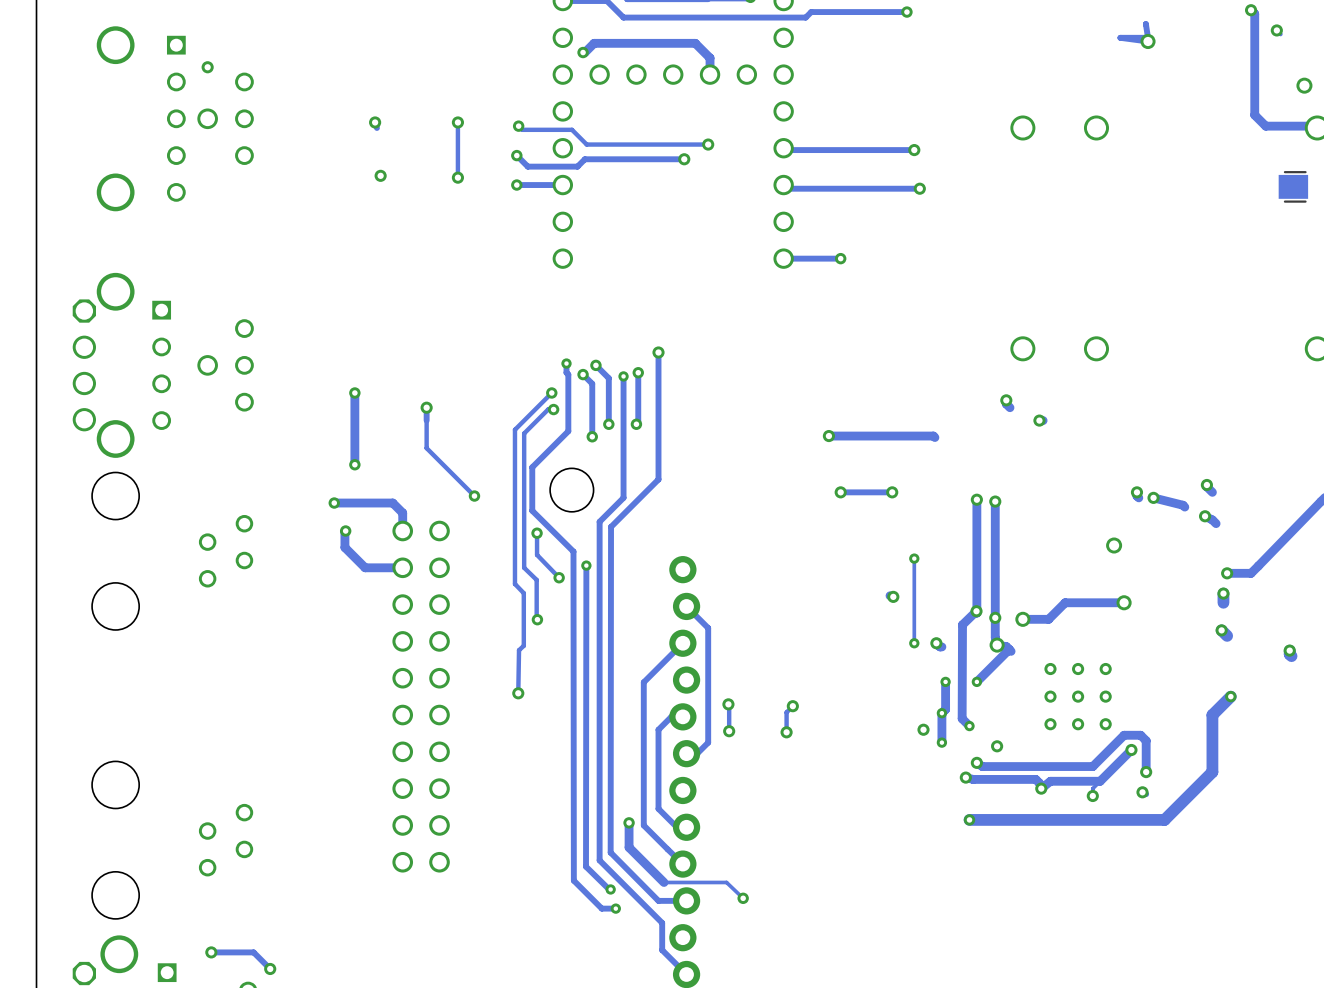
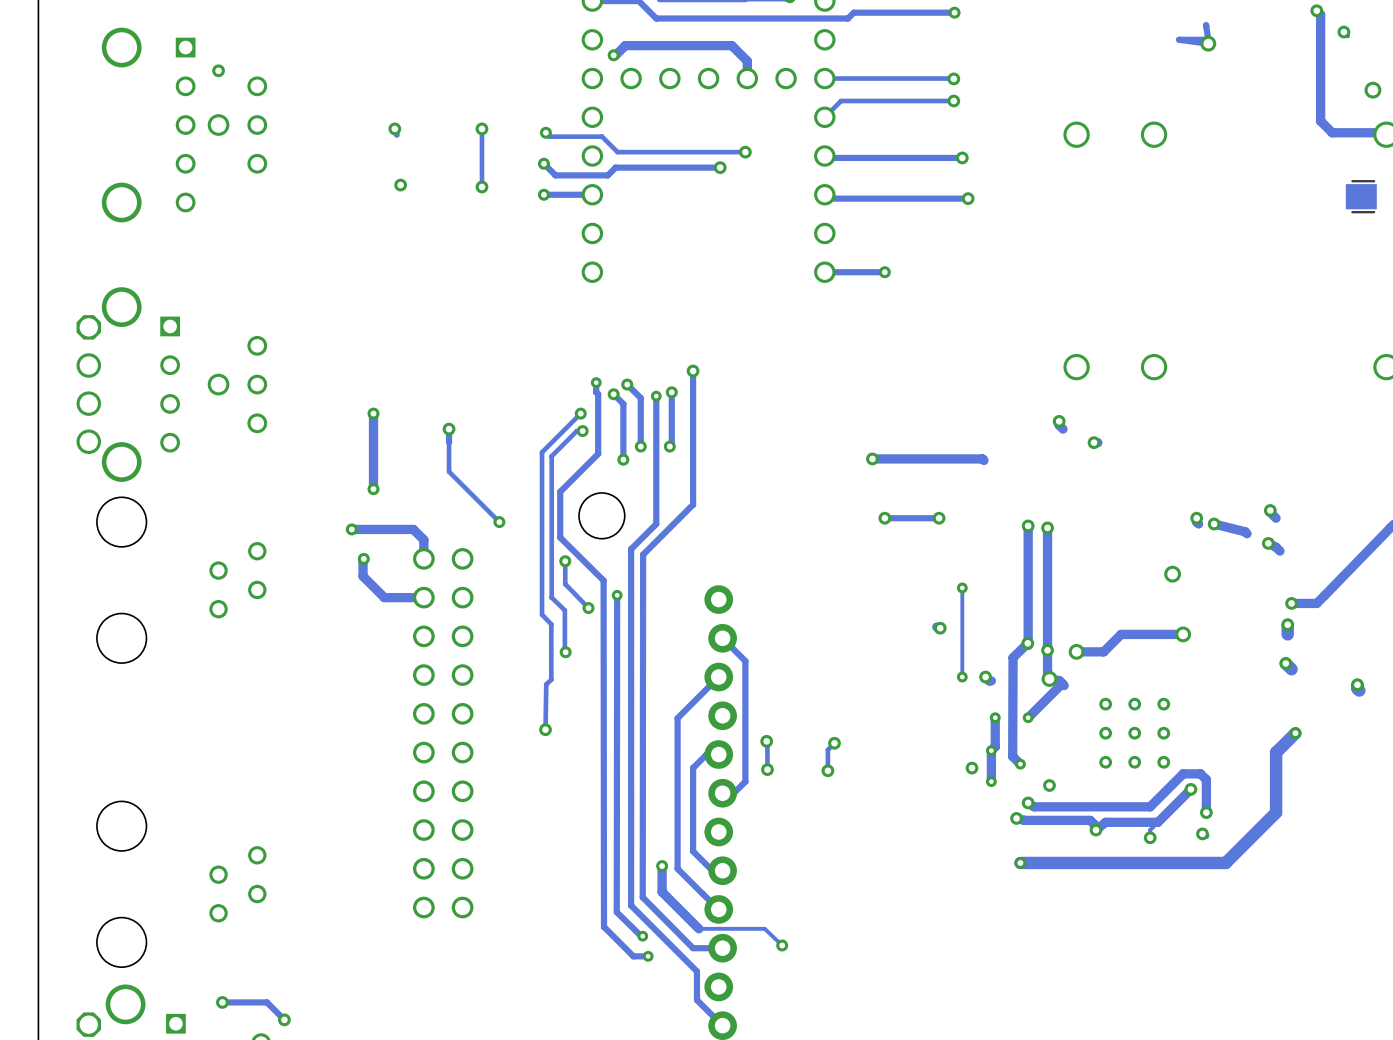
track: none -> (824, 78) (953, 78)
via: none -> (953, 78)
track: none -> (953, 101) (841, 101) (824, 117)
via: none -> (953, 101)

